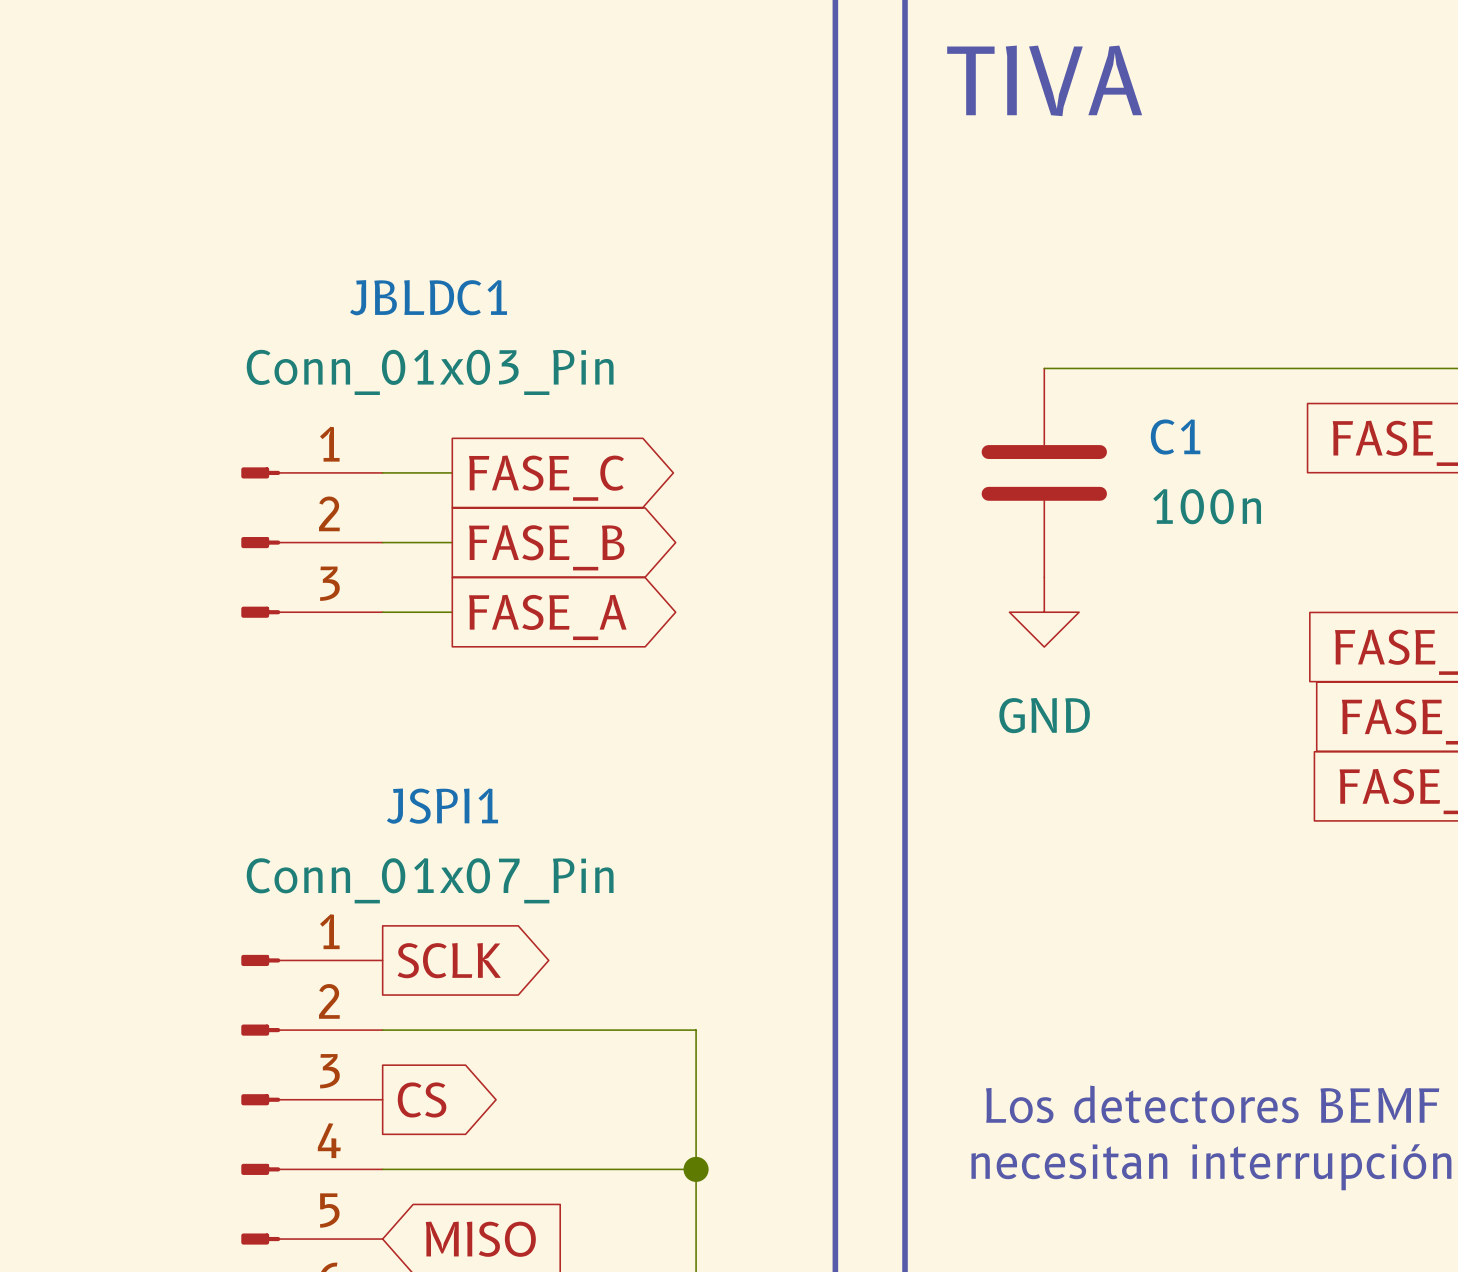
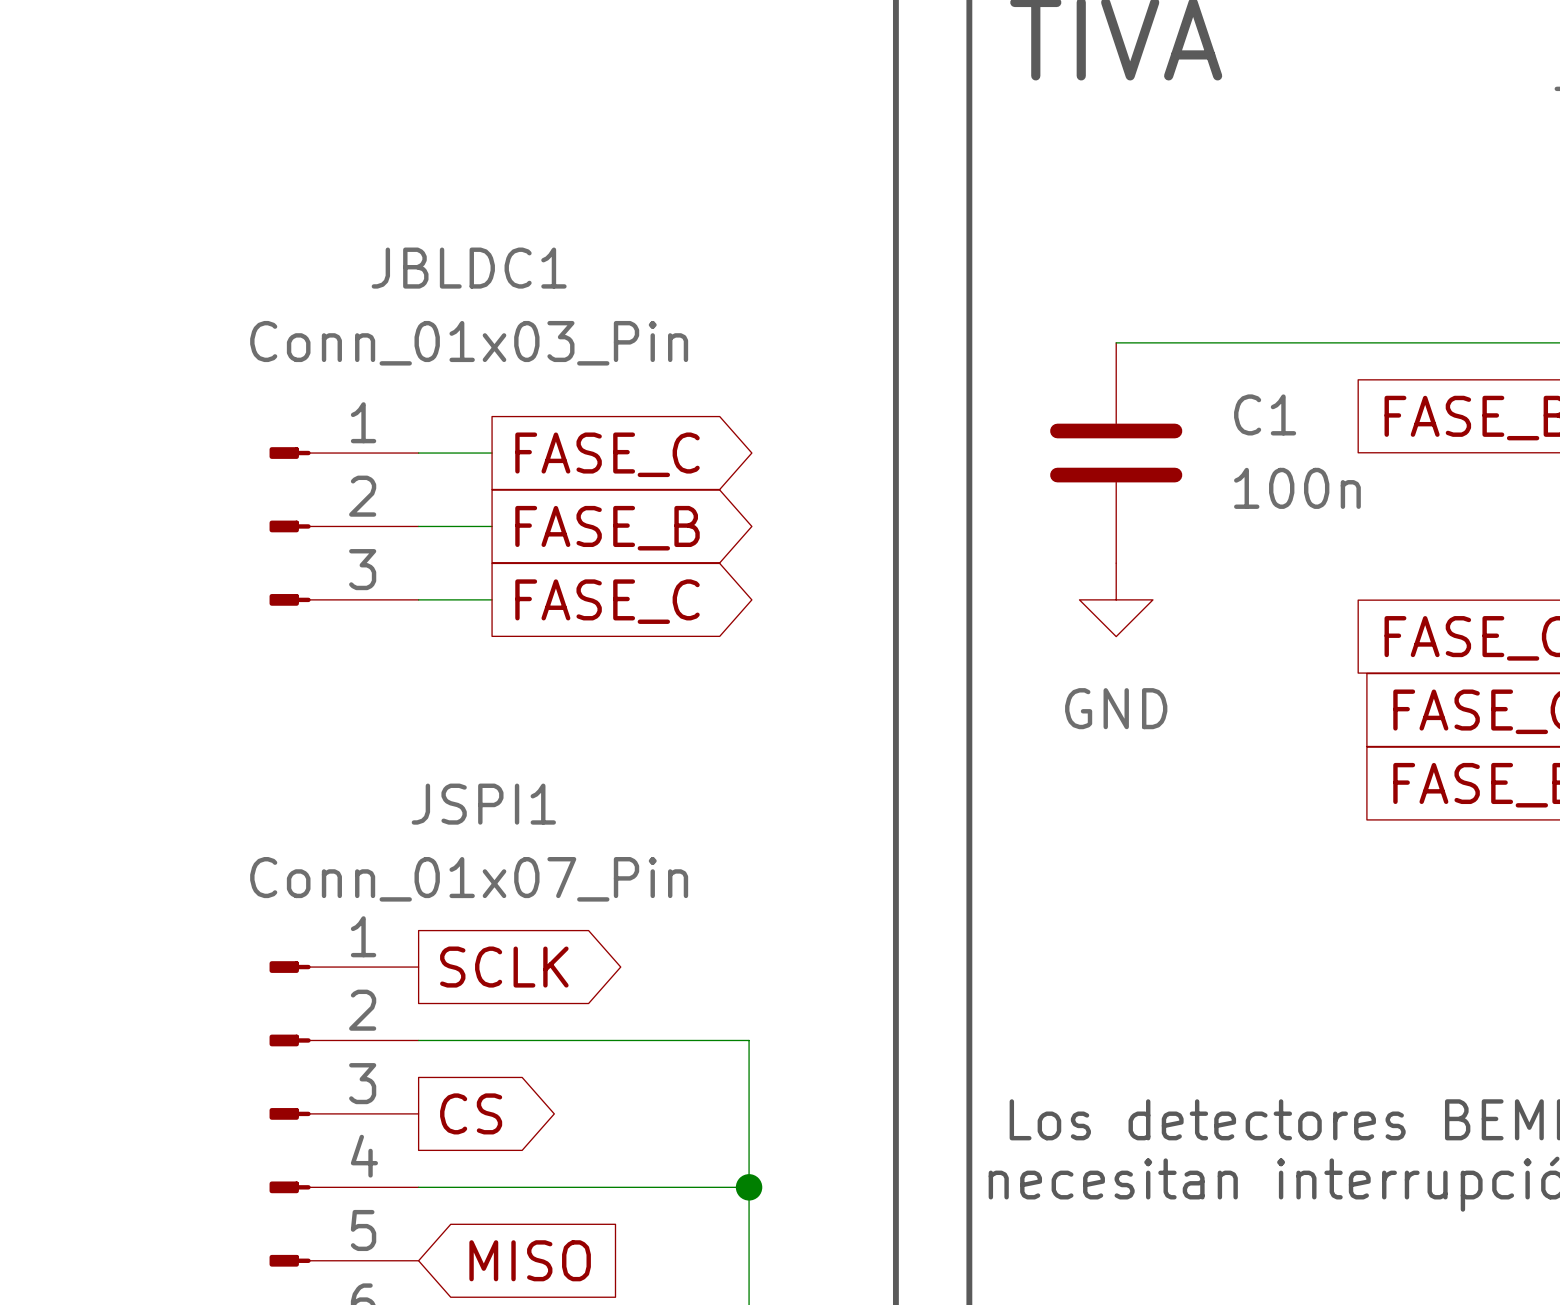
global label: FASE_A (547, 617) -> FASE_C (607, 601)

